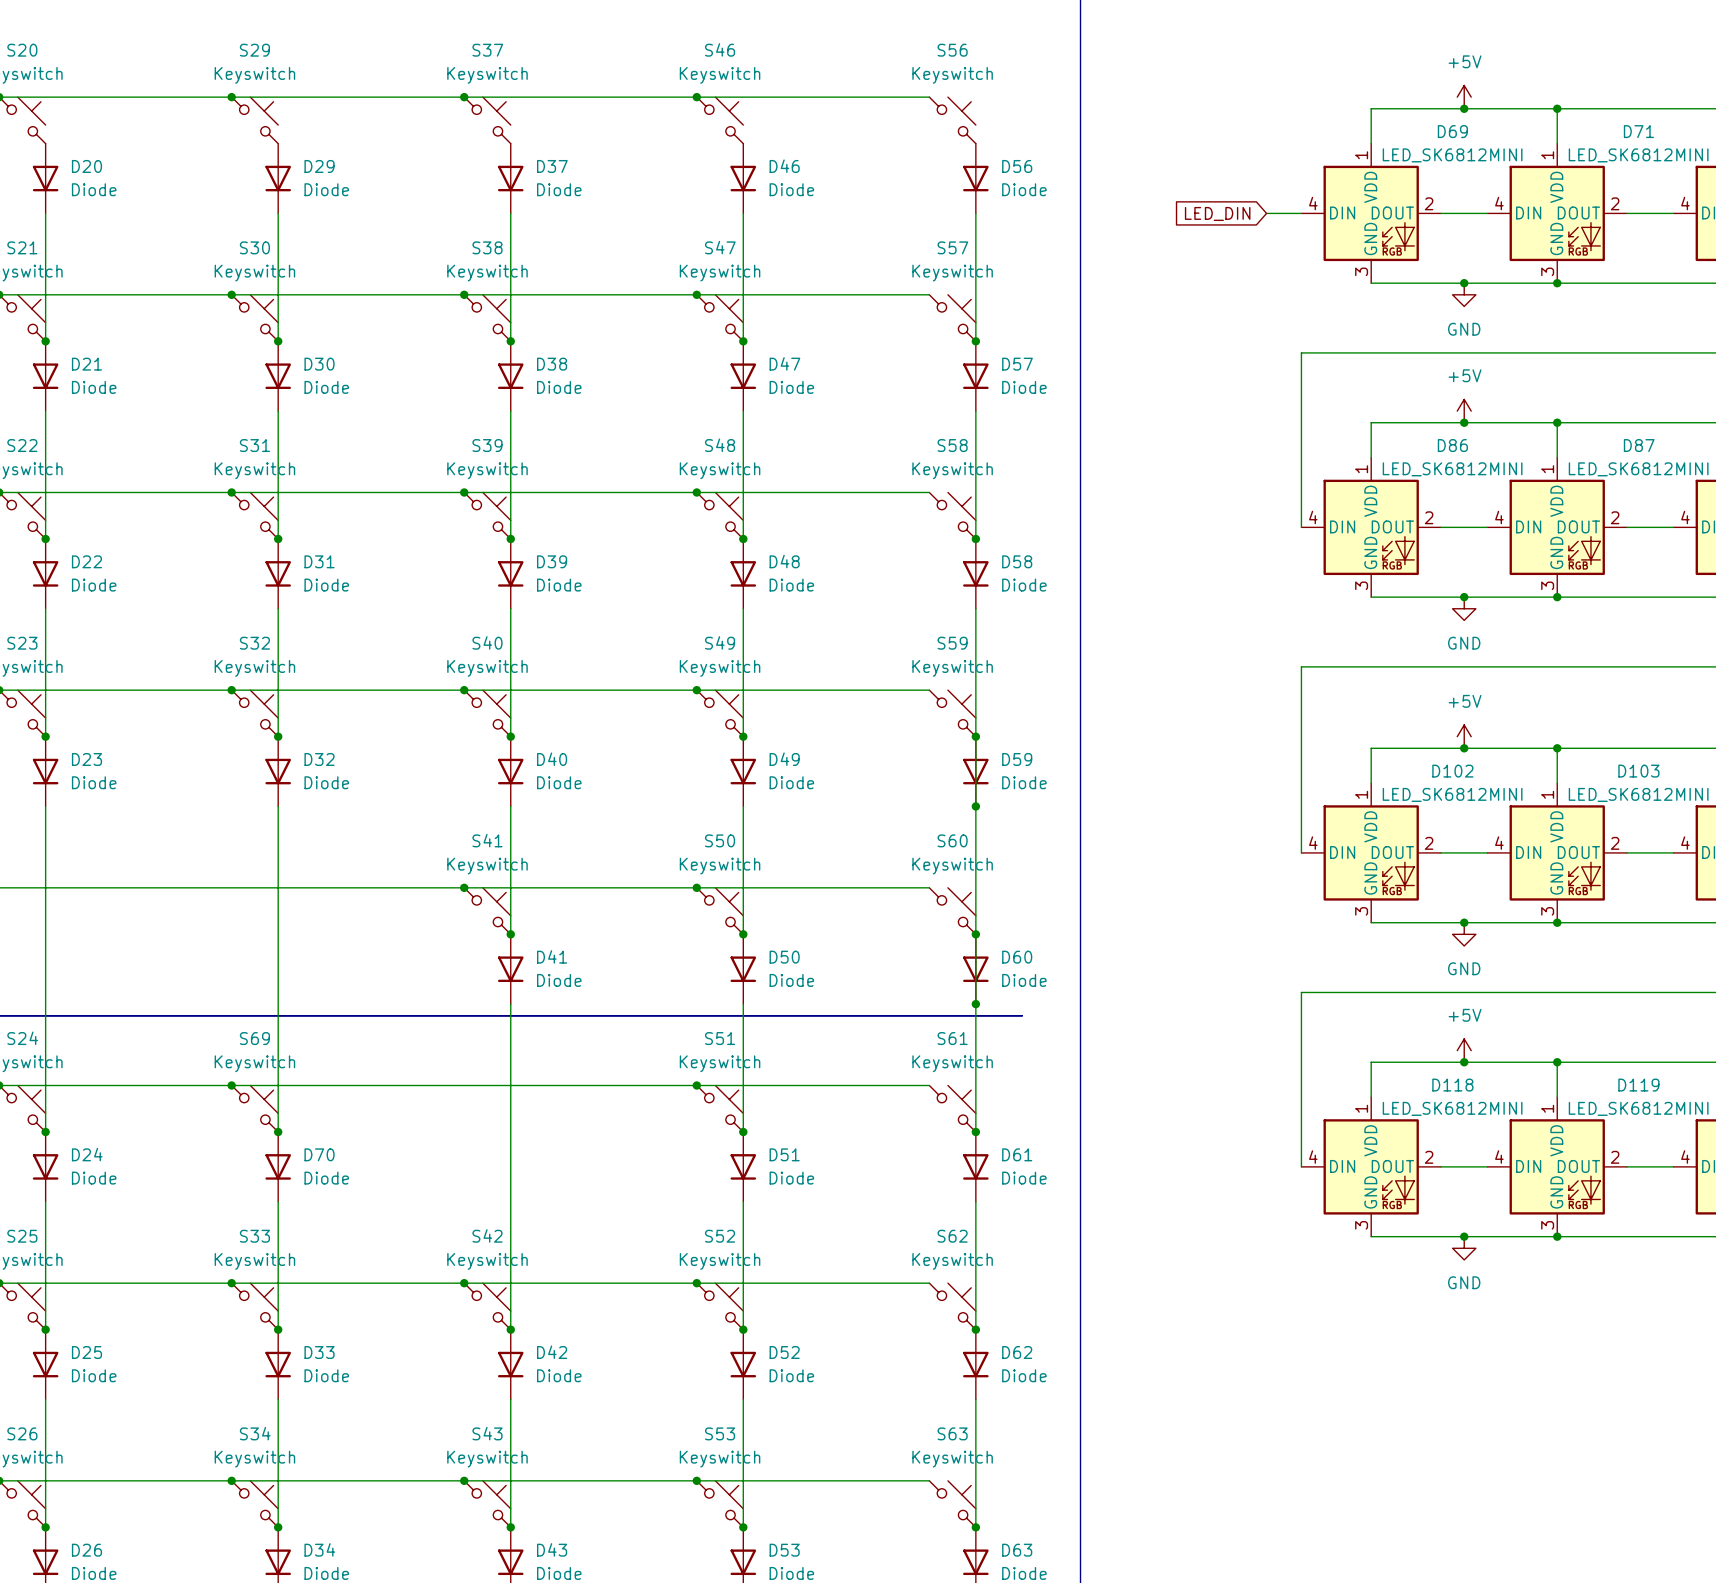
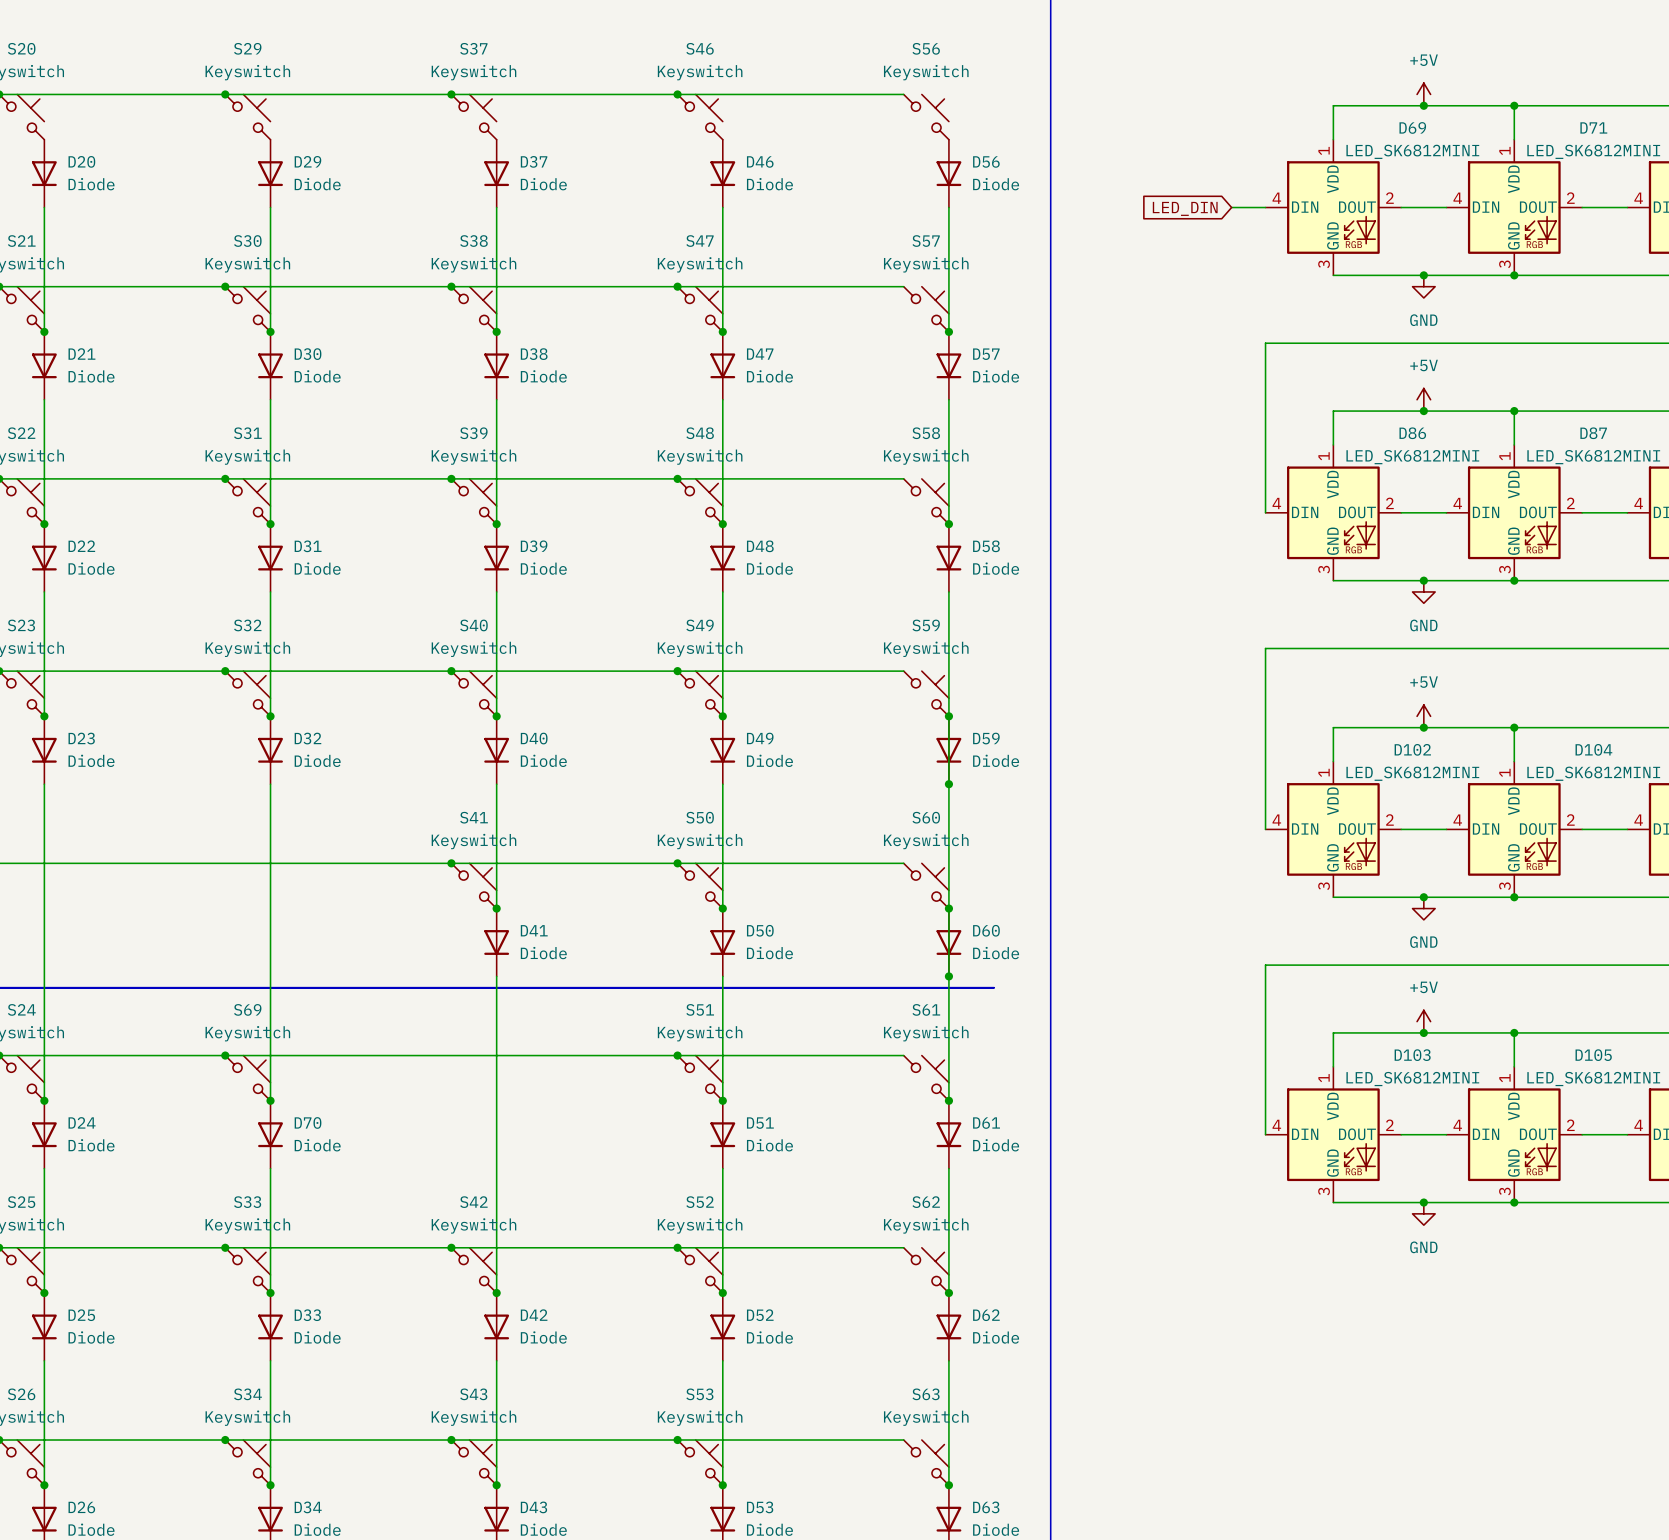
D103 name: D103 (1638, 771) -> D104 (1593, 749)
D118 name: D118 (1452, 1085) -> D103 (1412, 1055)
D119 name: D119 (1638, 1085) -> D105 (1593, 1055)

